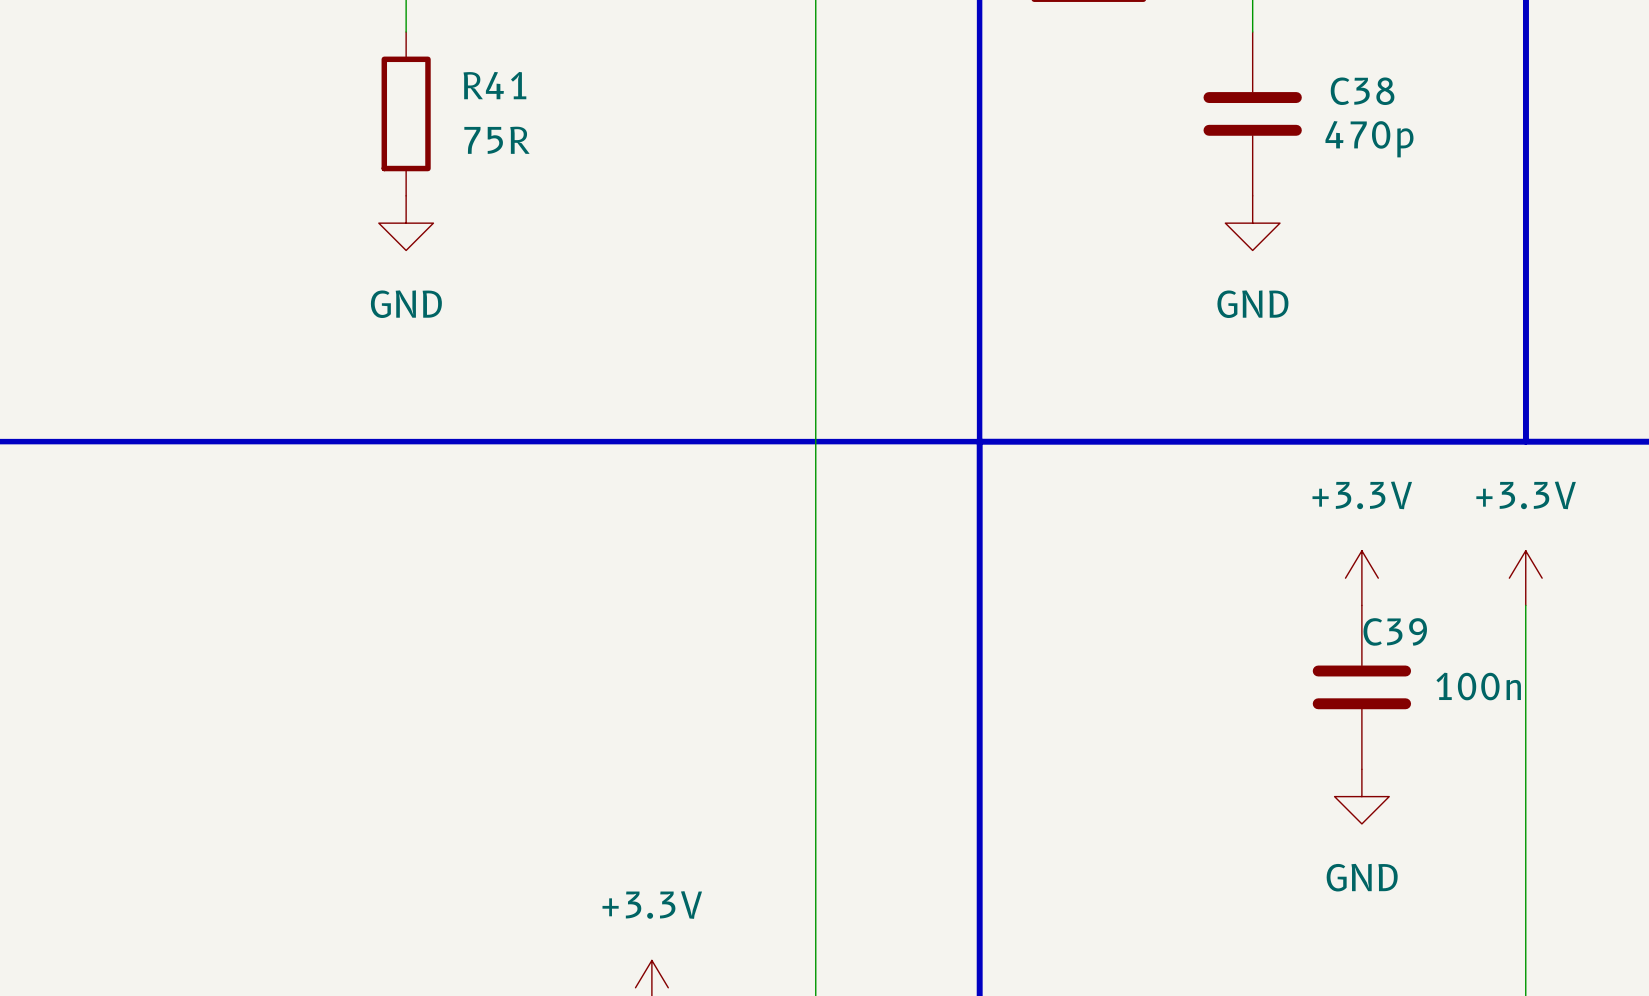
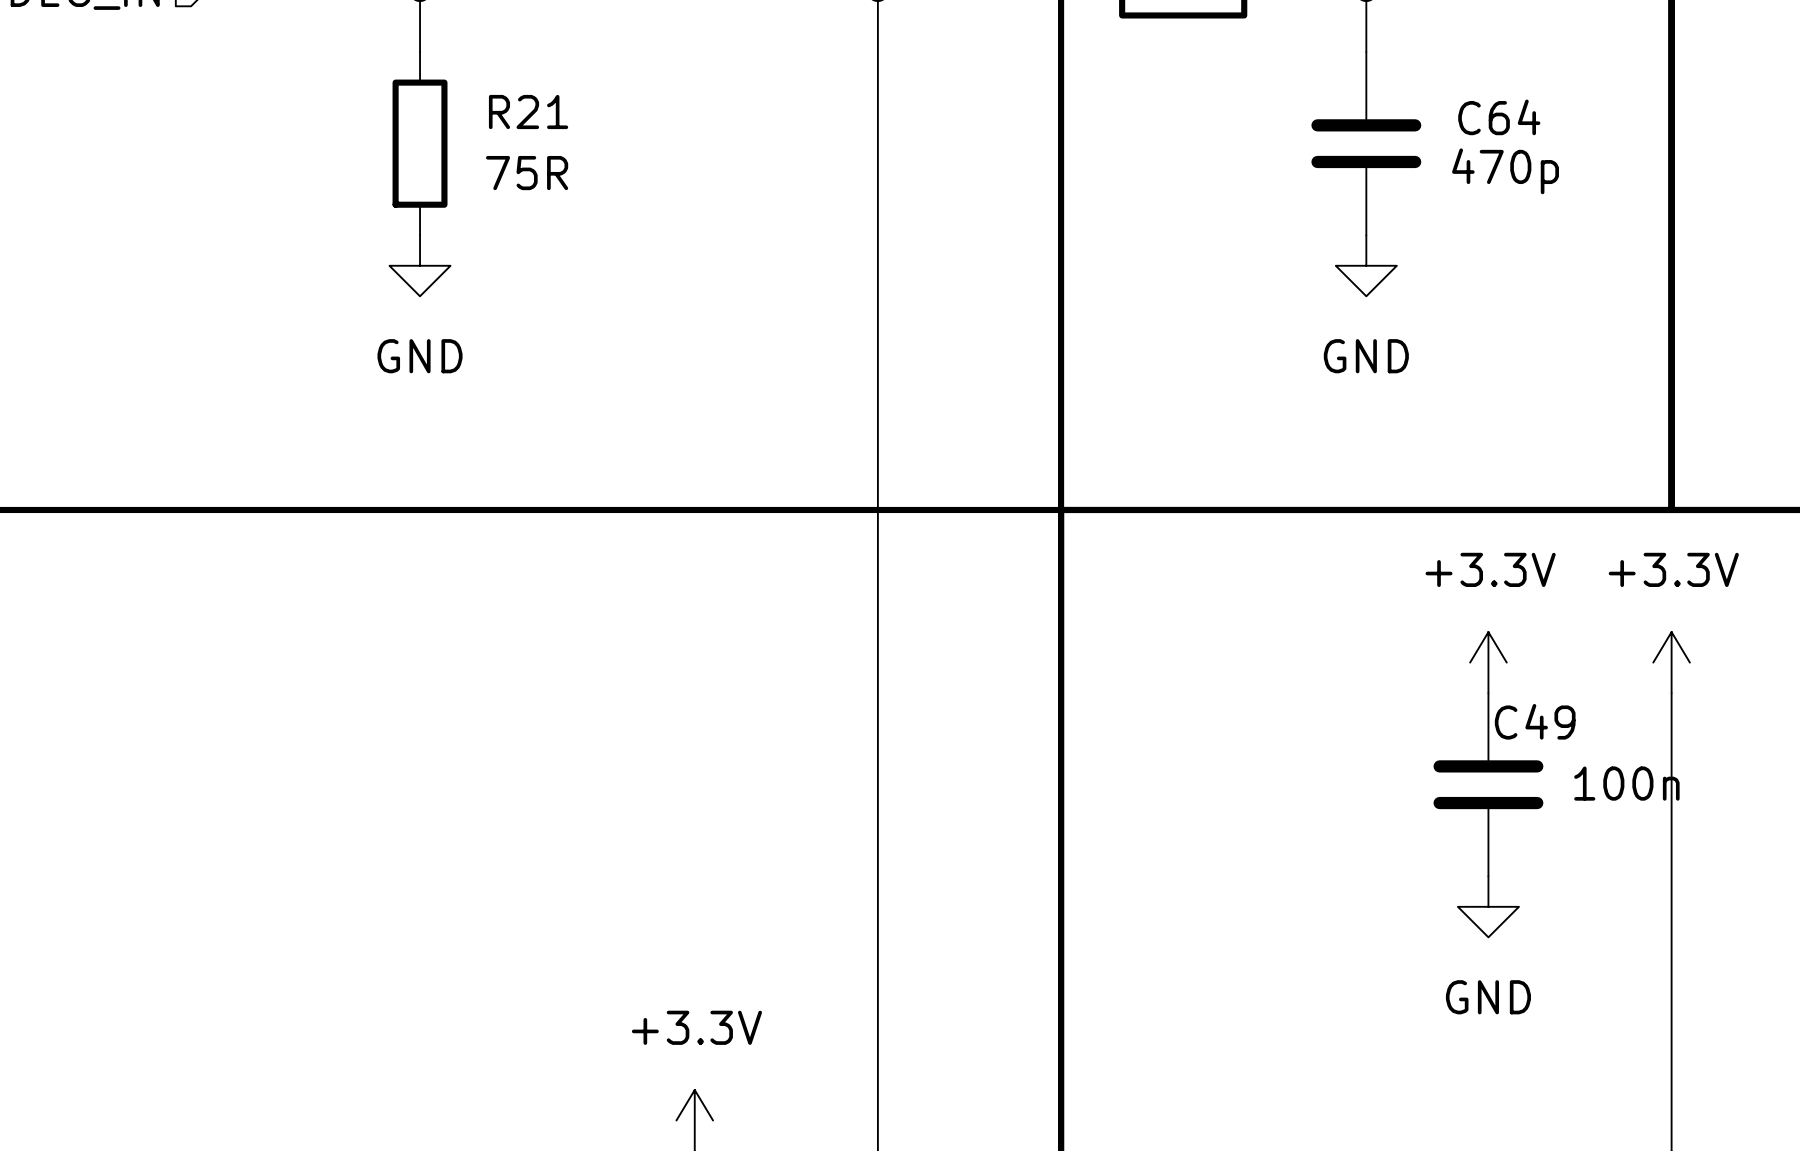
R41 name: R41 (494, 85) -> R21 (528, 112)
C38 name: C38 (1362, 91) -> C64 (1499, 117)
C39 name: C39 (1395, 631) -> C49 (1535, 721)

